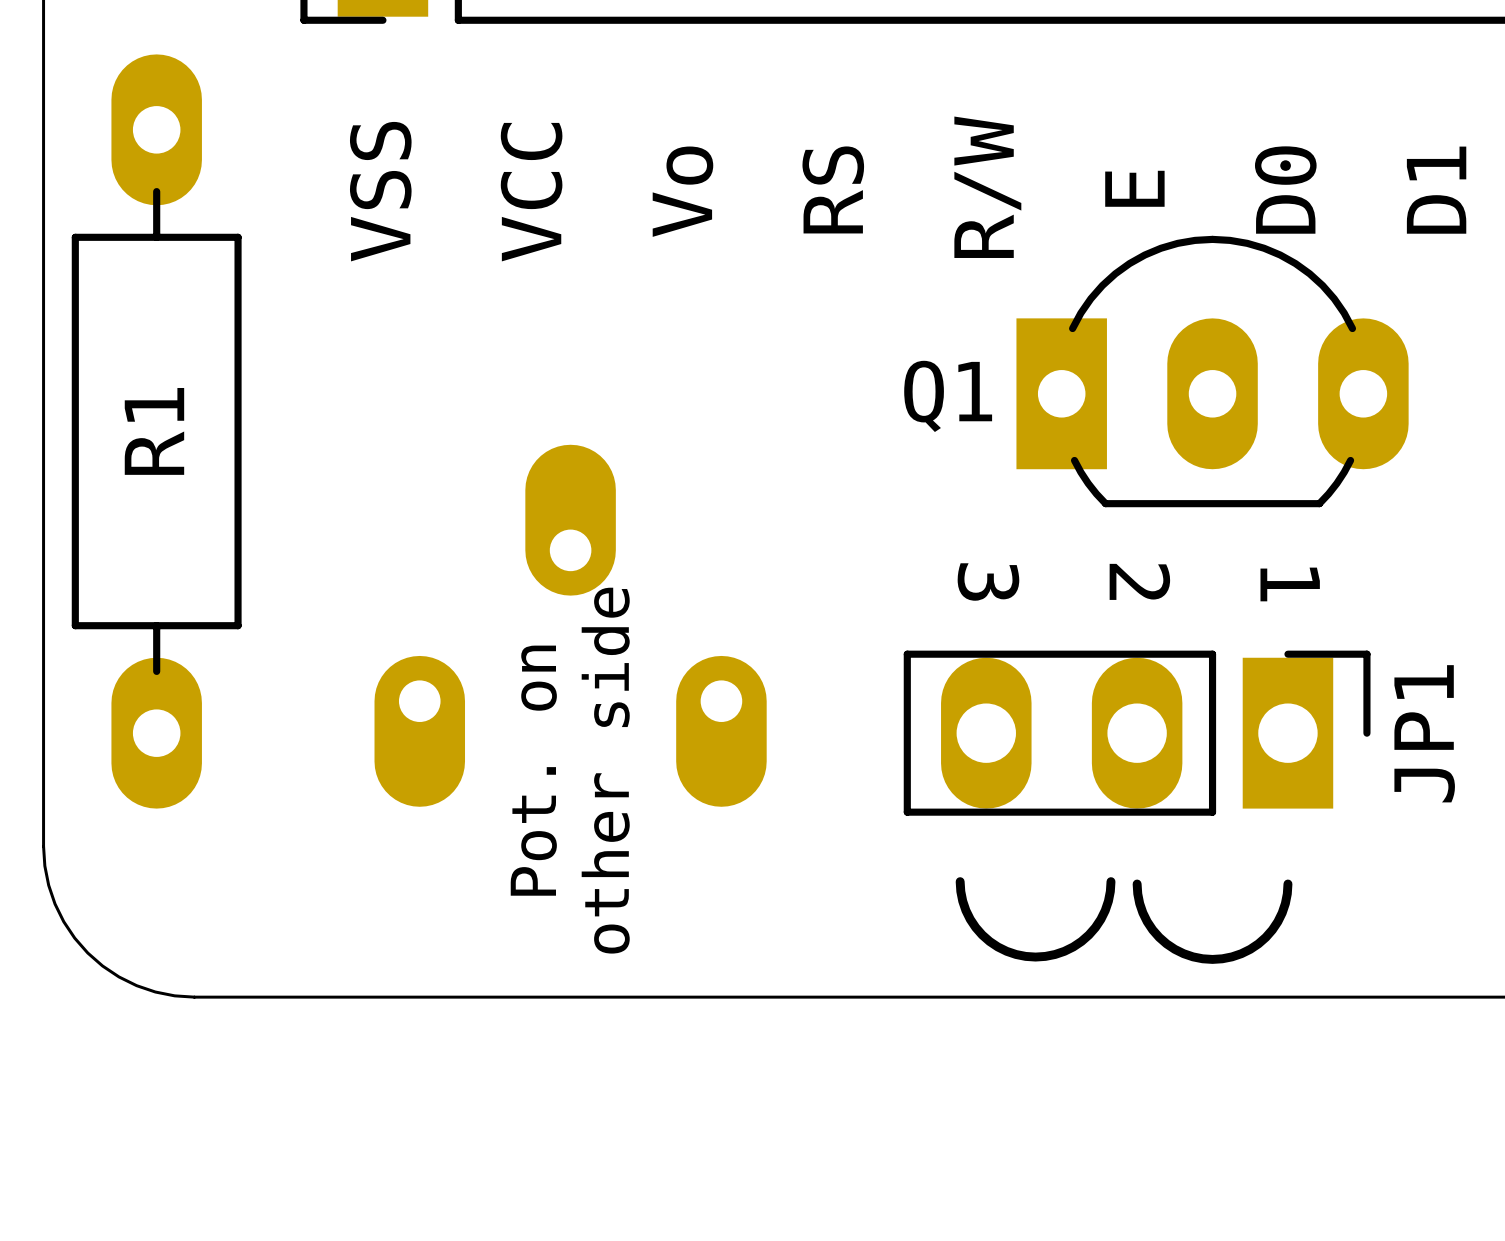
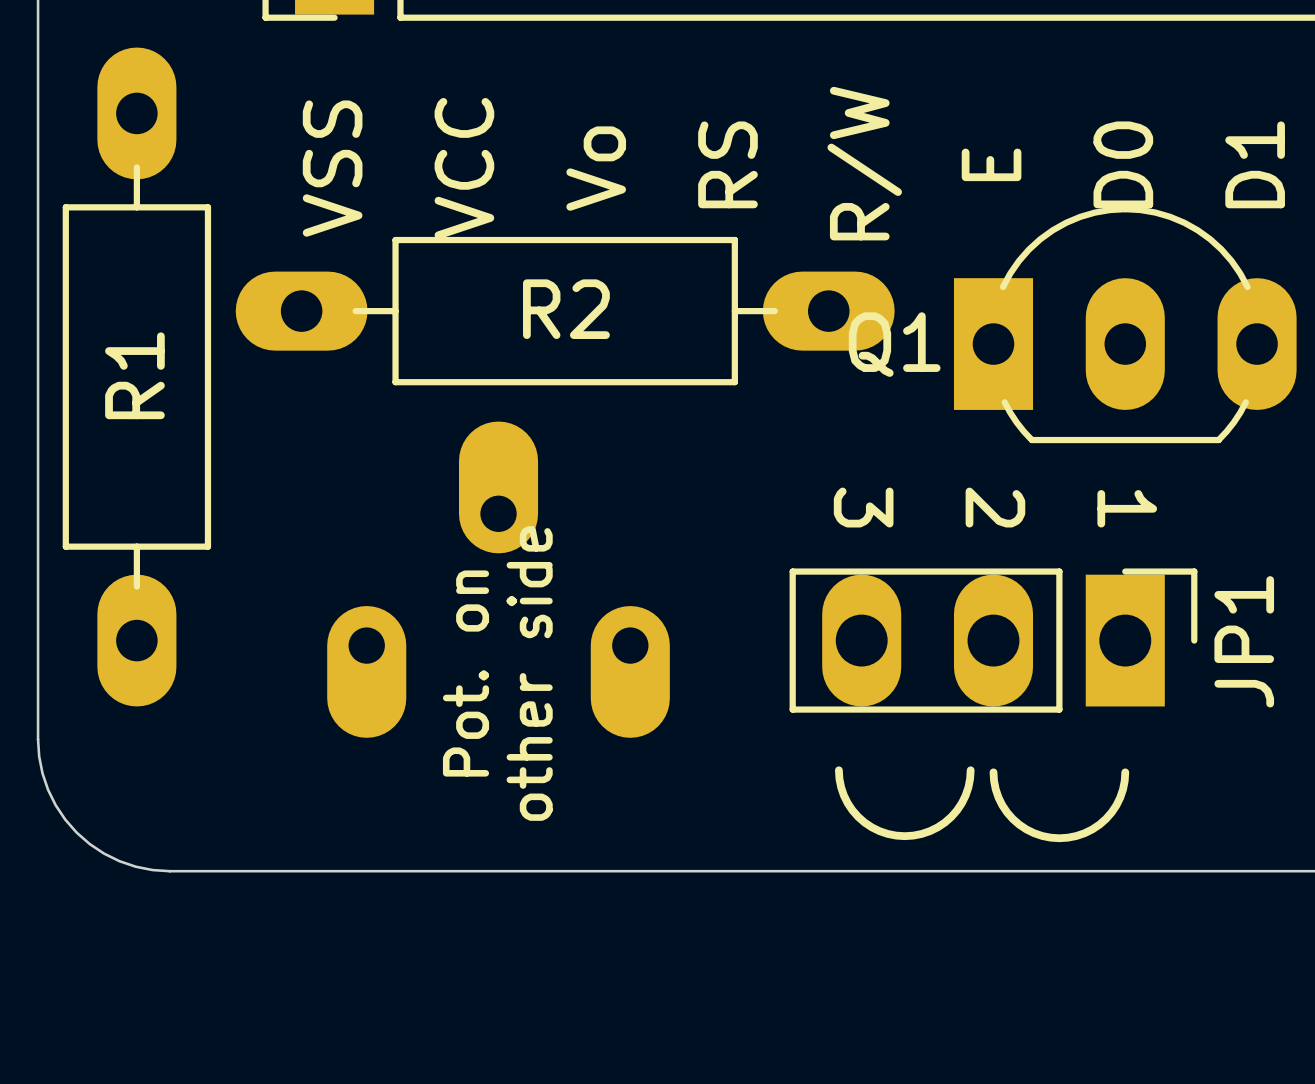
R2: none -> (565, 311)
Q1 position: (1212, 371) -> (1125, 324)
part position: (570, 625) -> (498, 579)

